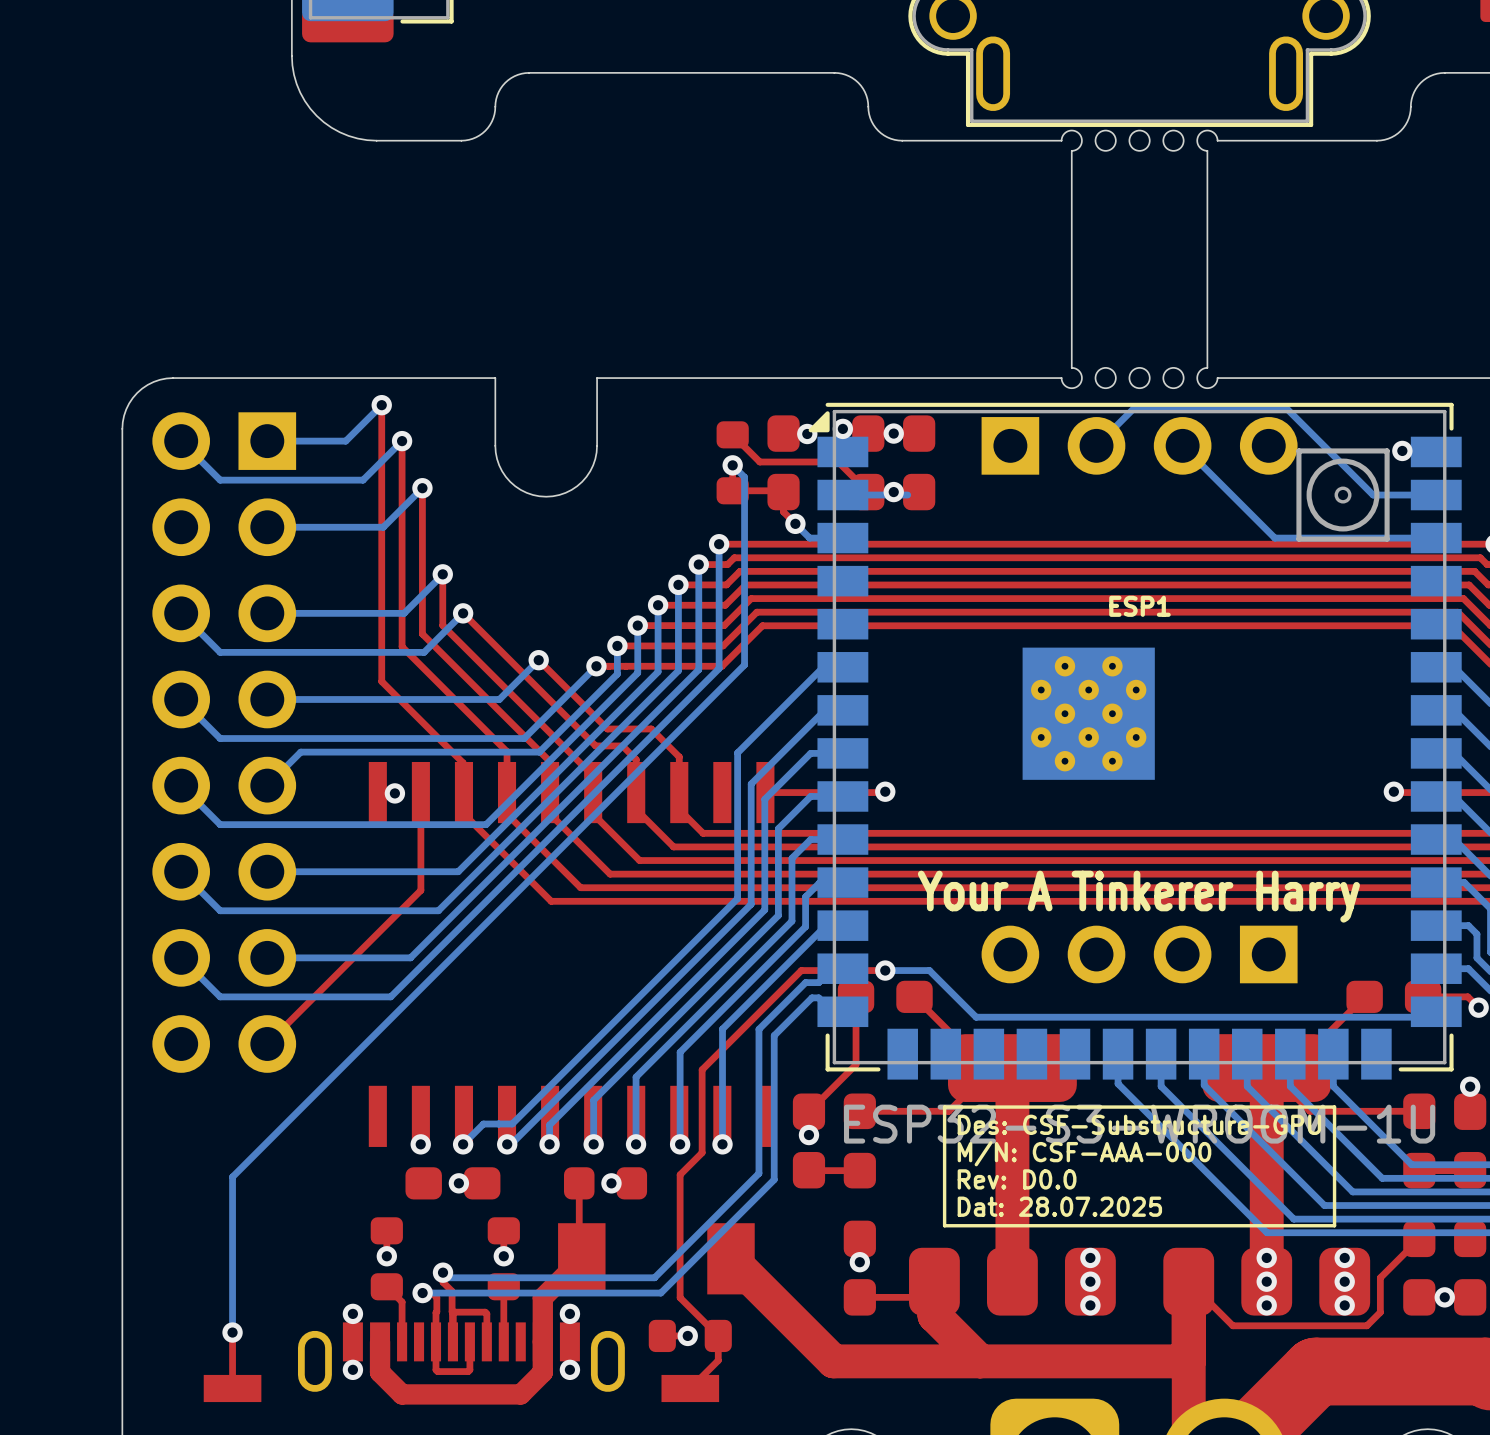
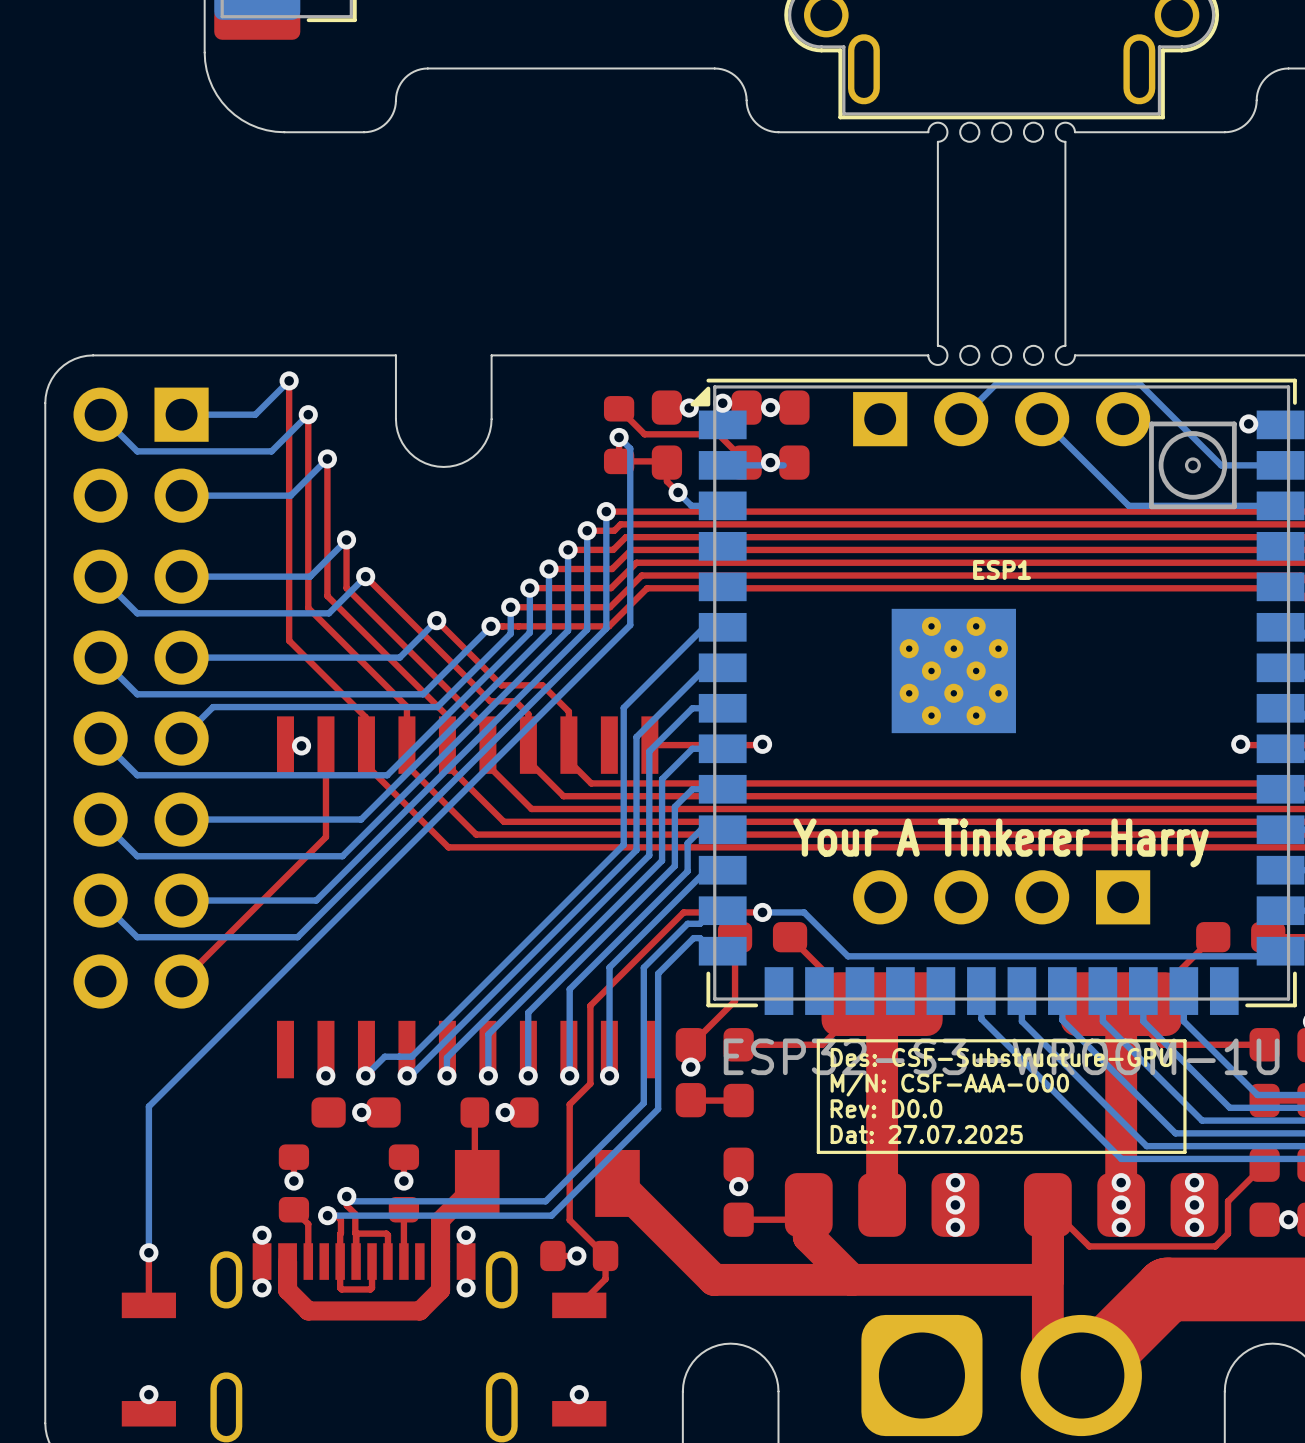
text: Dat: 28.07.2025 (1059, 1206) -> Dat: 27.07.2025 (926, 1134)

